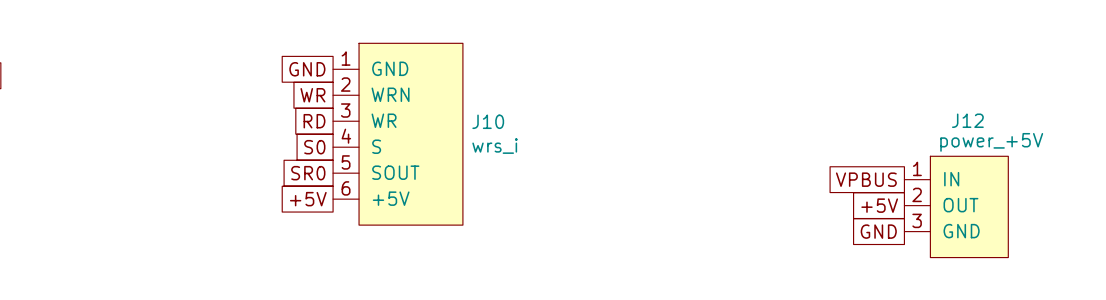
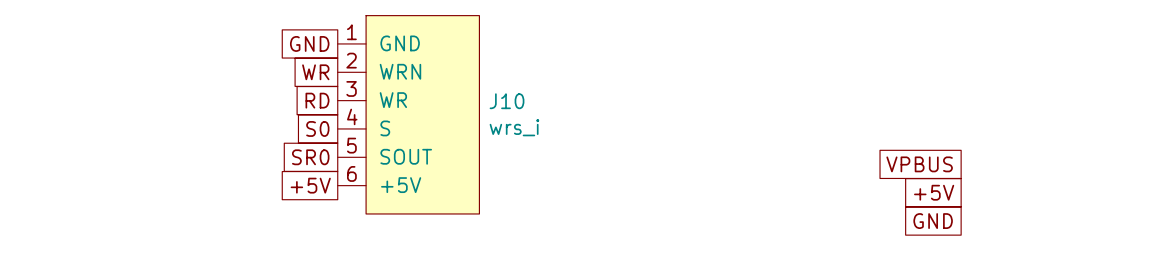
J12: power_+5V (956, 206) -> none

